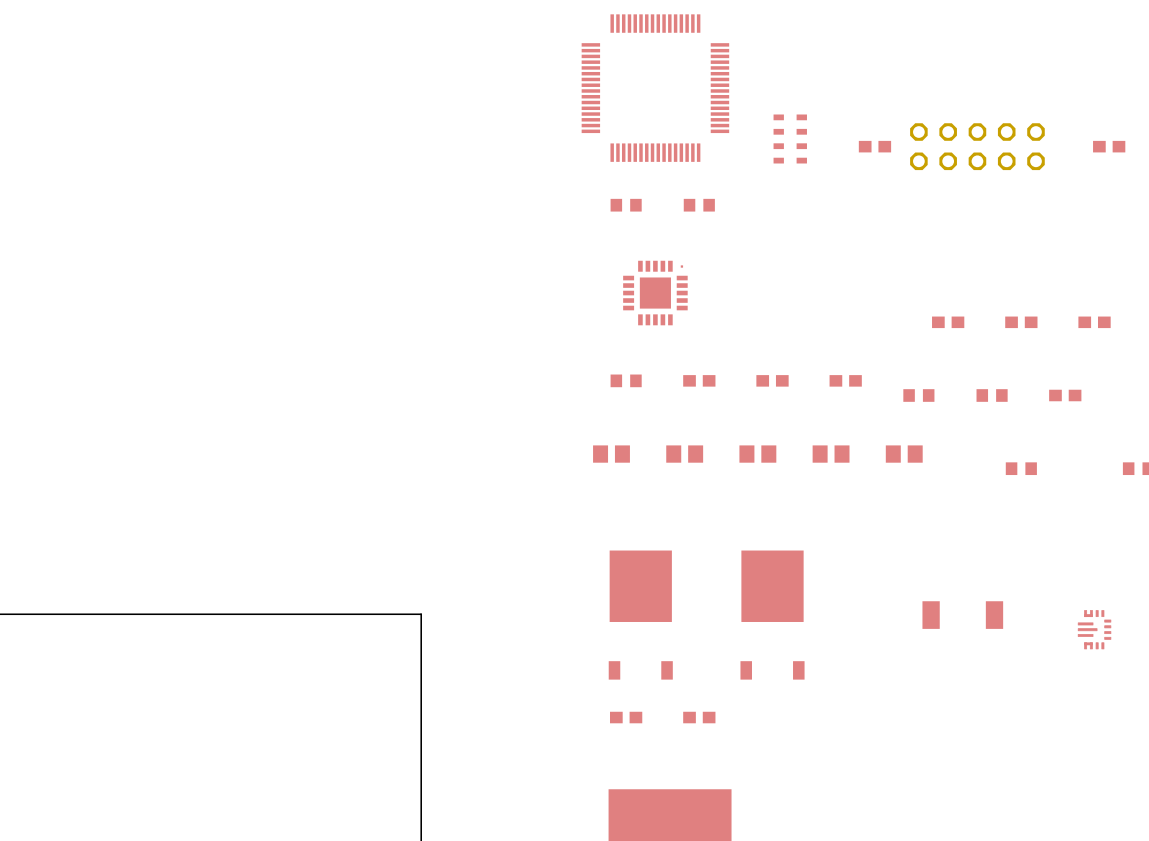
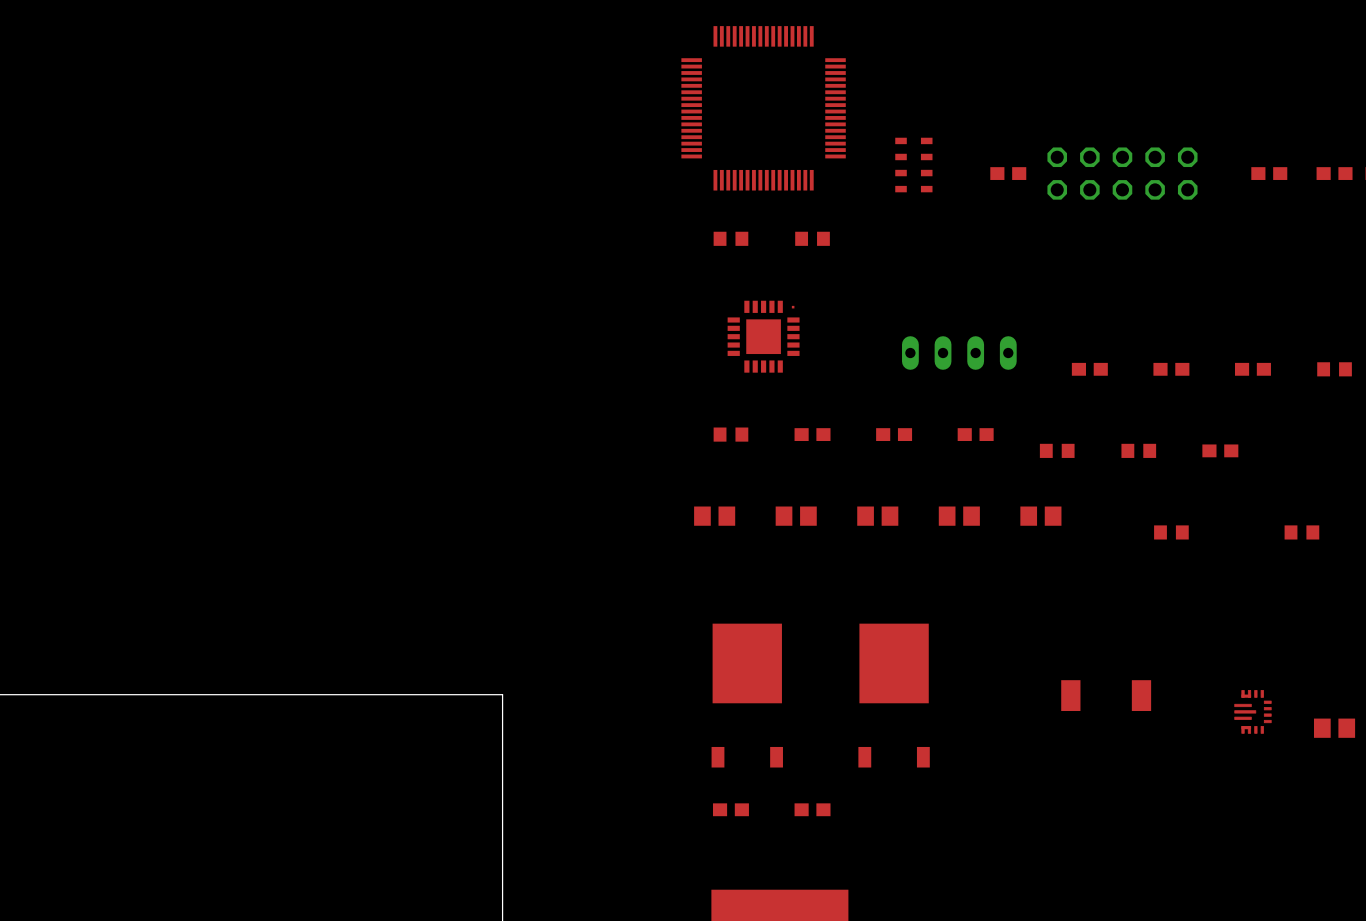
part: none -> (959, 353)

